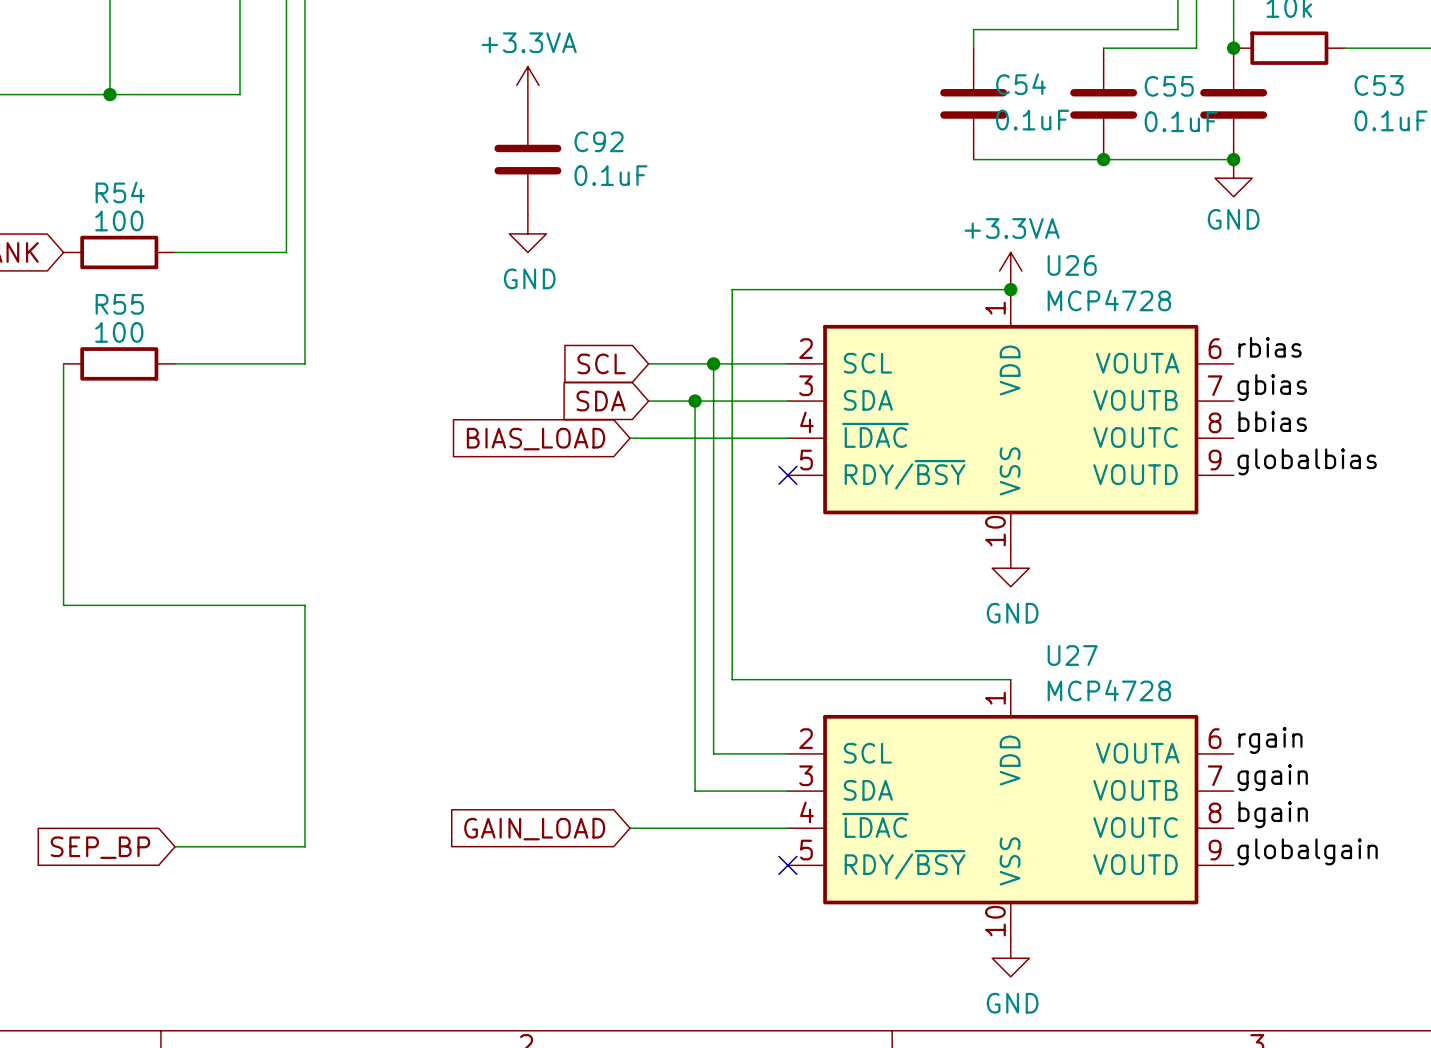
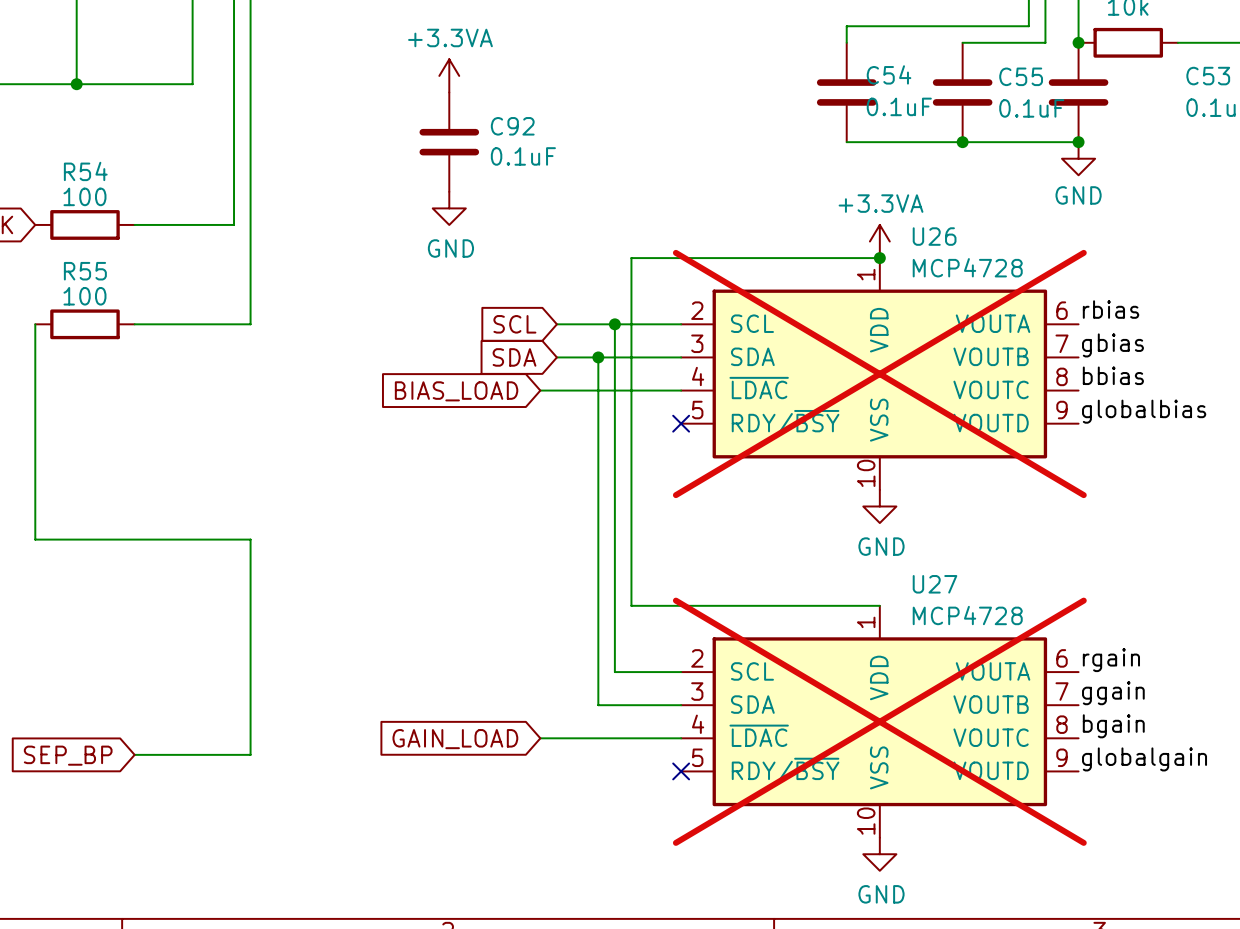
U26 do-not-place cross: none -> (879, 374)
U27 do-not-place cross: none -> (879, 721)

